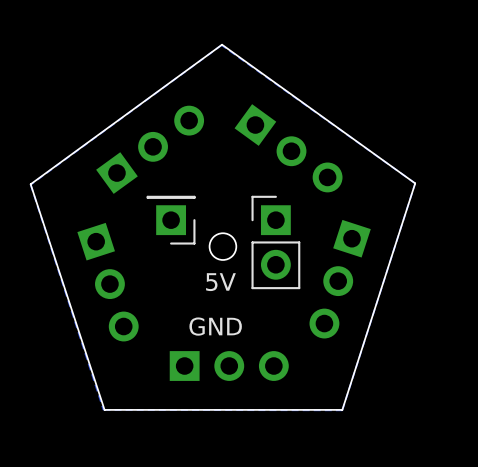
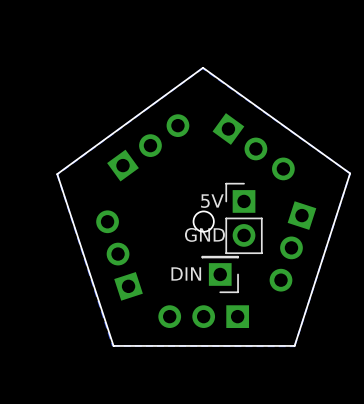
part position: (171, 220) -> (220, 274)
part rotation: 0° (108, 282) -> 180° (119, 255)
text position: 5V (220, 282) -> 5V (212, 201)
text: none -> DIN (186, 273)
text position: GND (215, 326) -> GND (204, 234)
part rotation: 0° (229, 366) -> 180° (203, 316)

